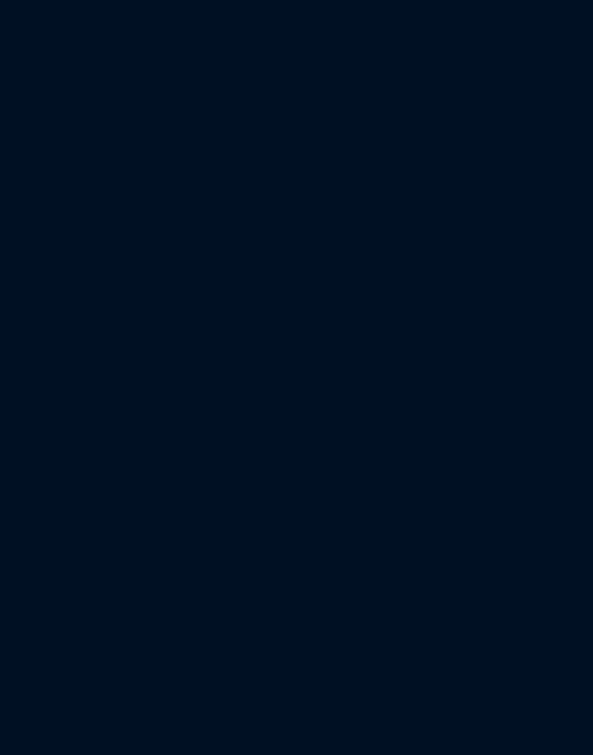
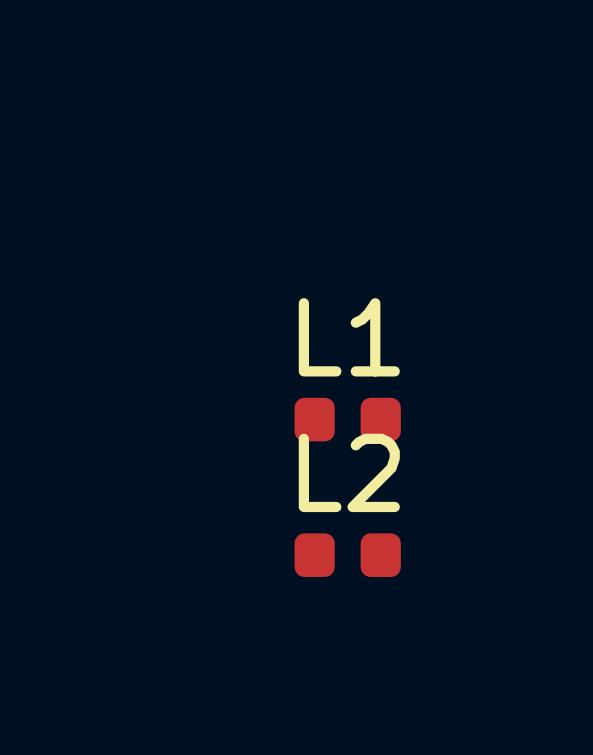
L1: none -> (347, 419)
L2: none -> (347, 555)

